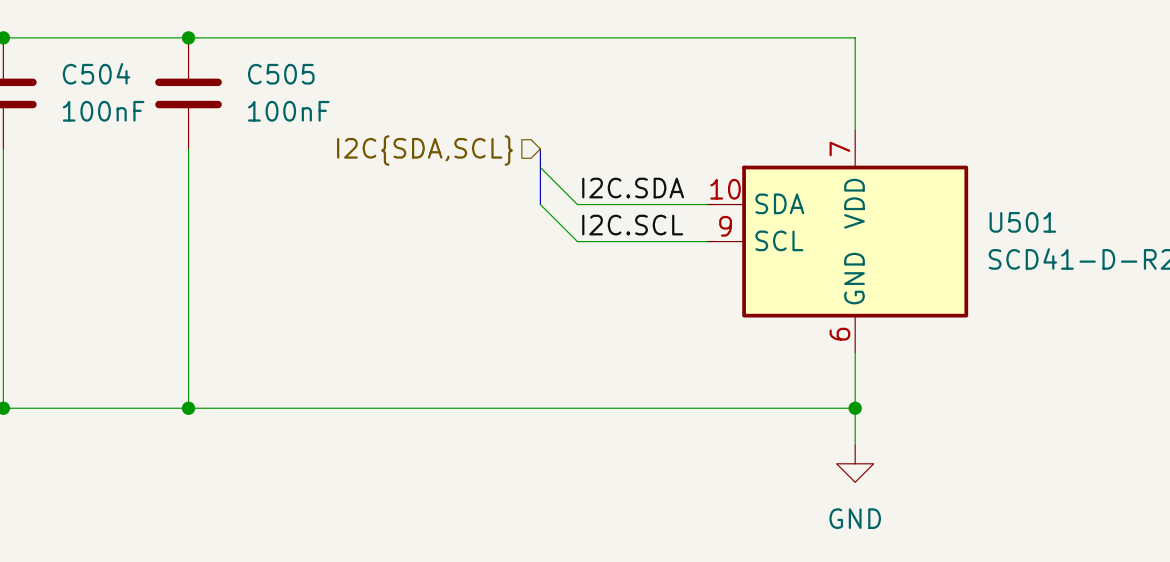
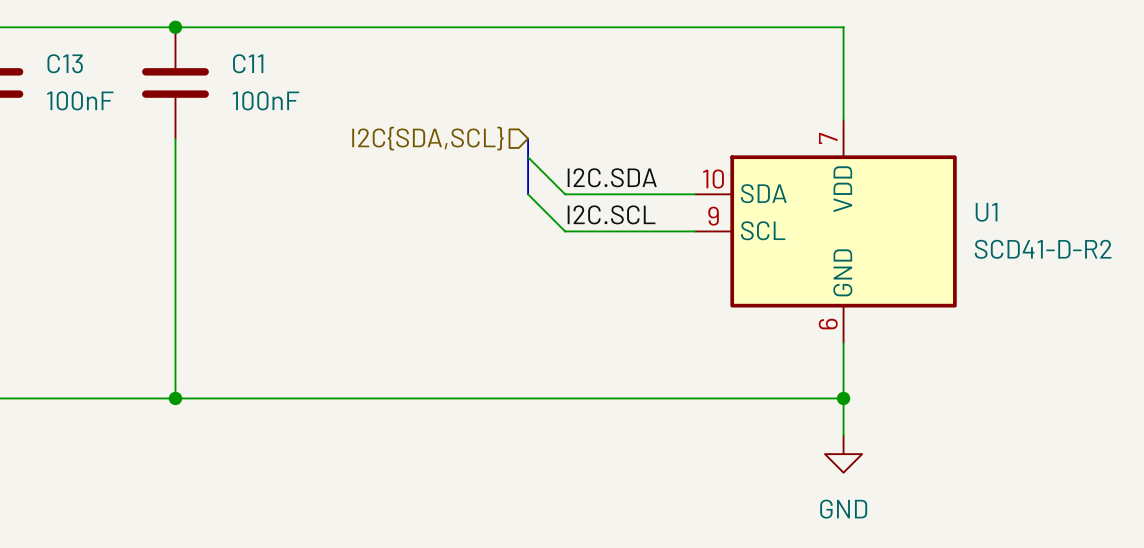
C504 name: C504 (96, 73) -> C13 (65, 63)
C505 name: C505 (281, 74) -> C11 (248, 63)
U501 name: U501 (1022, 222) -> U1 (986, 212)

